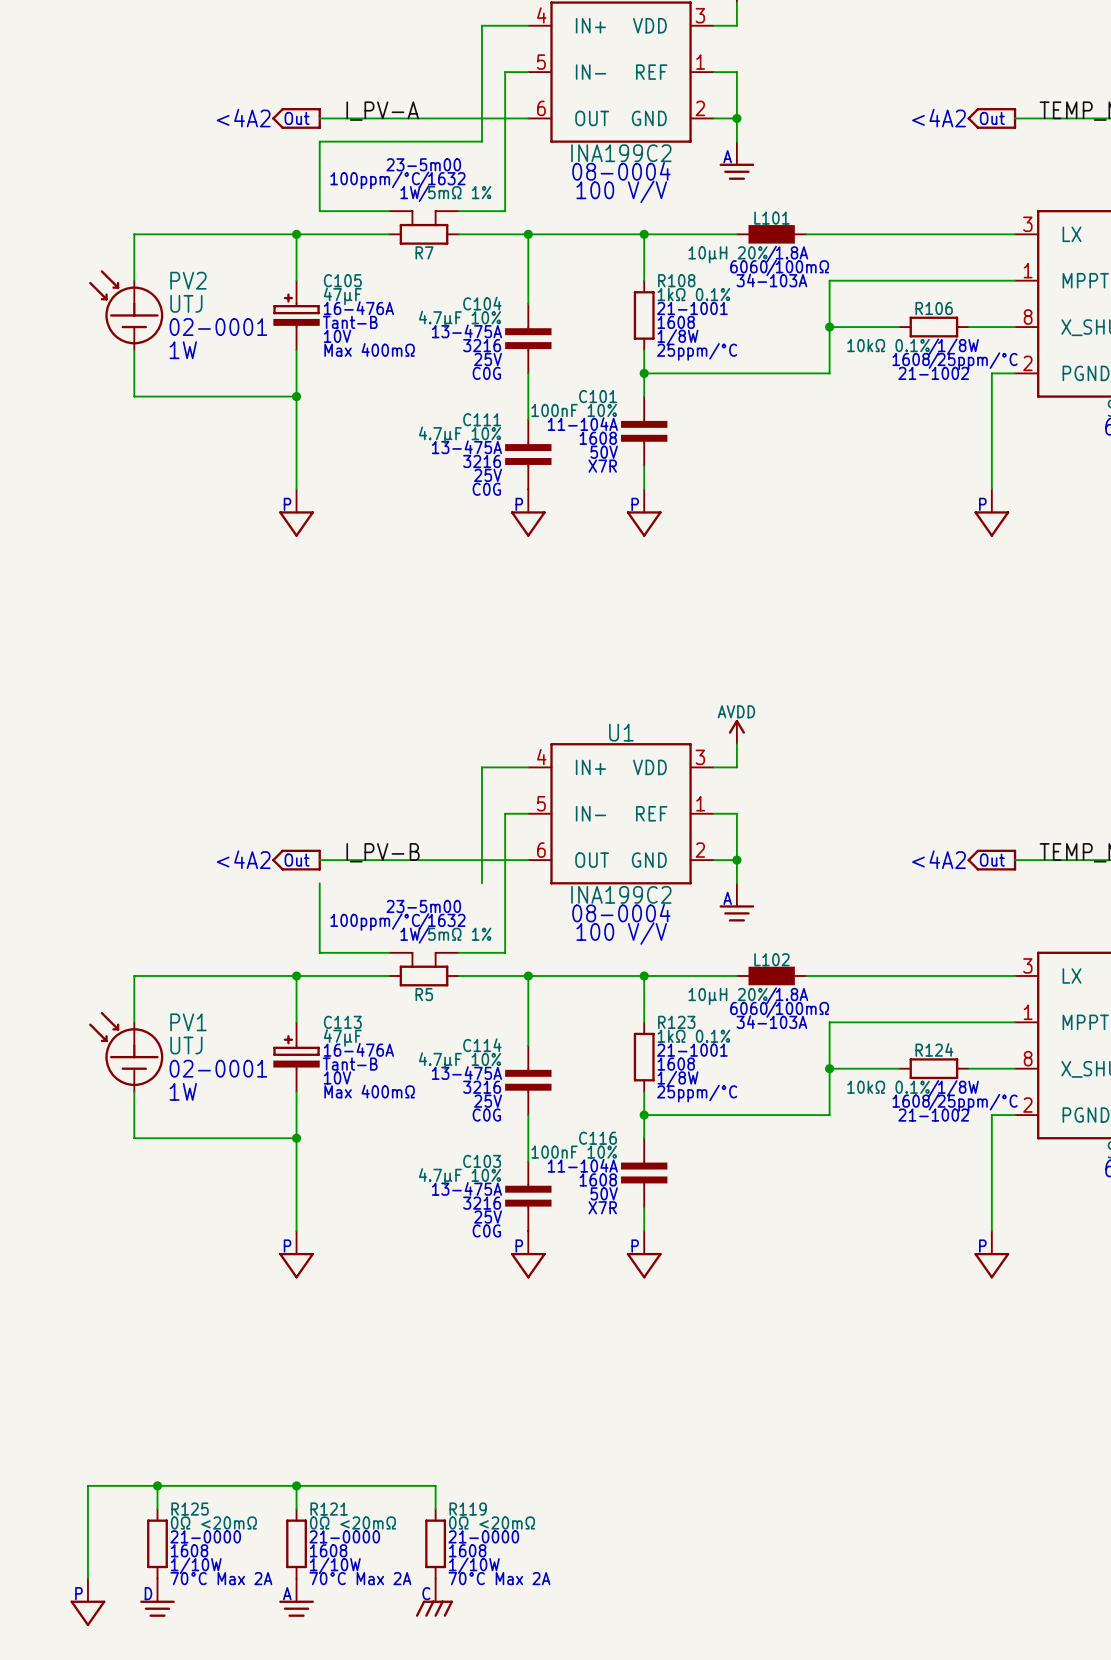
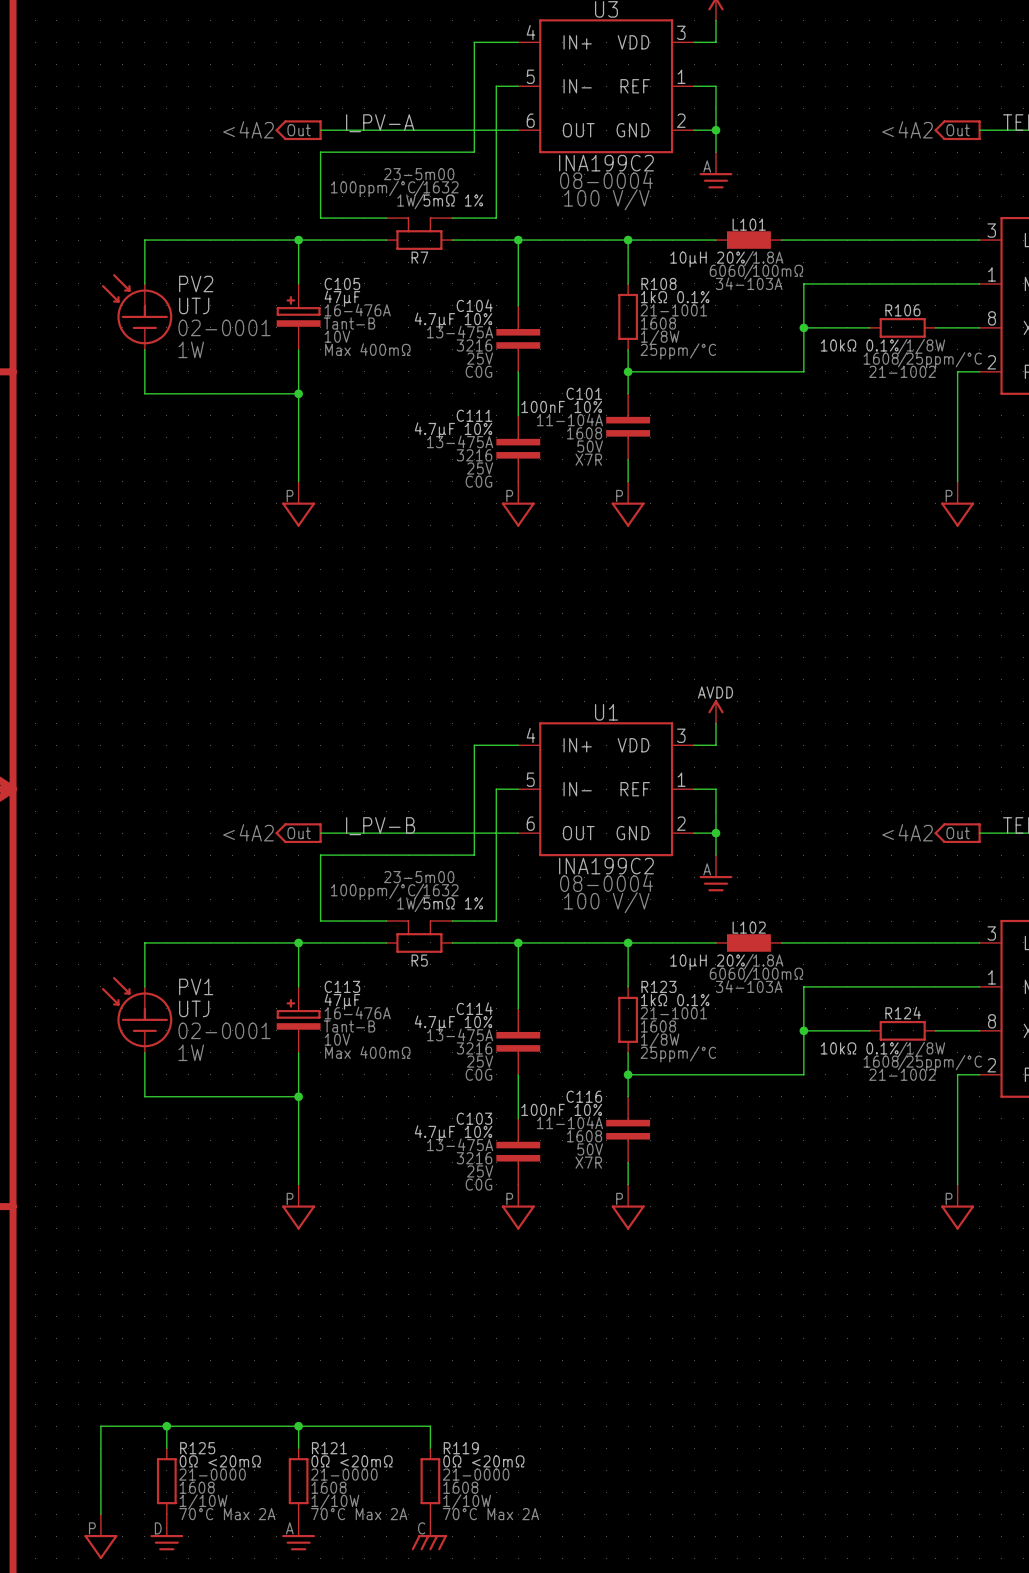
wire: none -> (320, 855) (474, 855)

